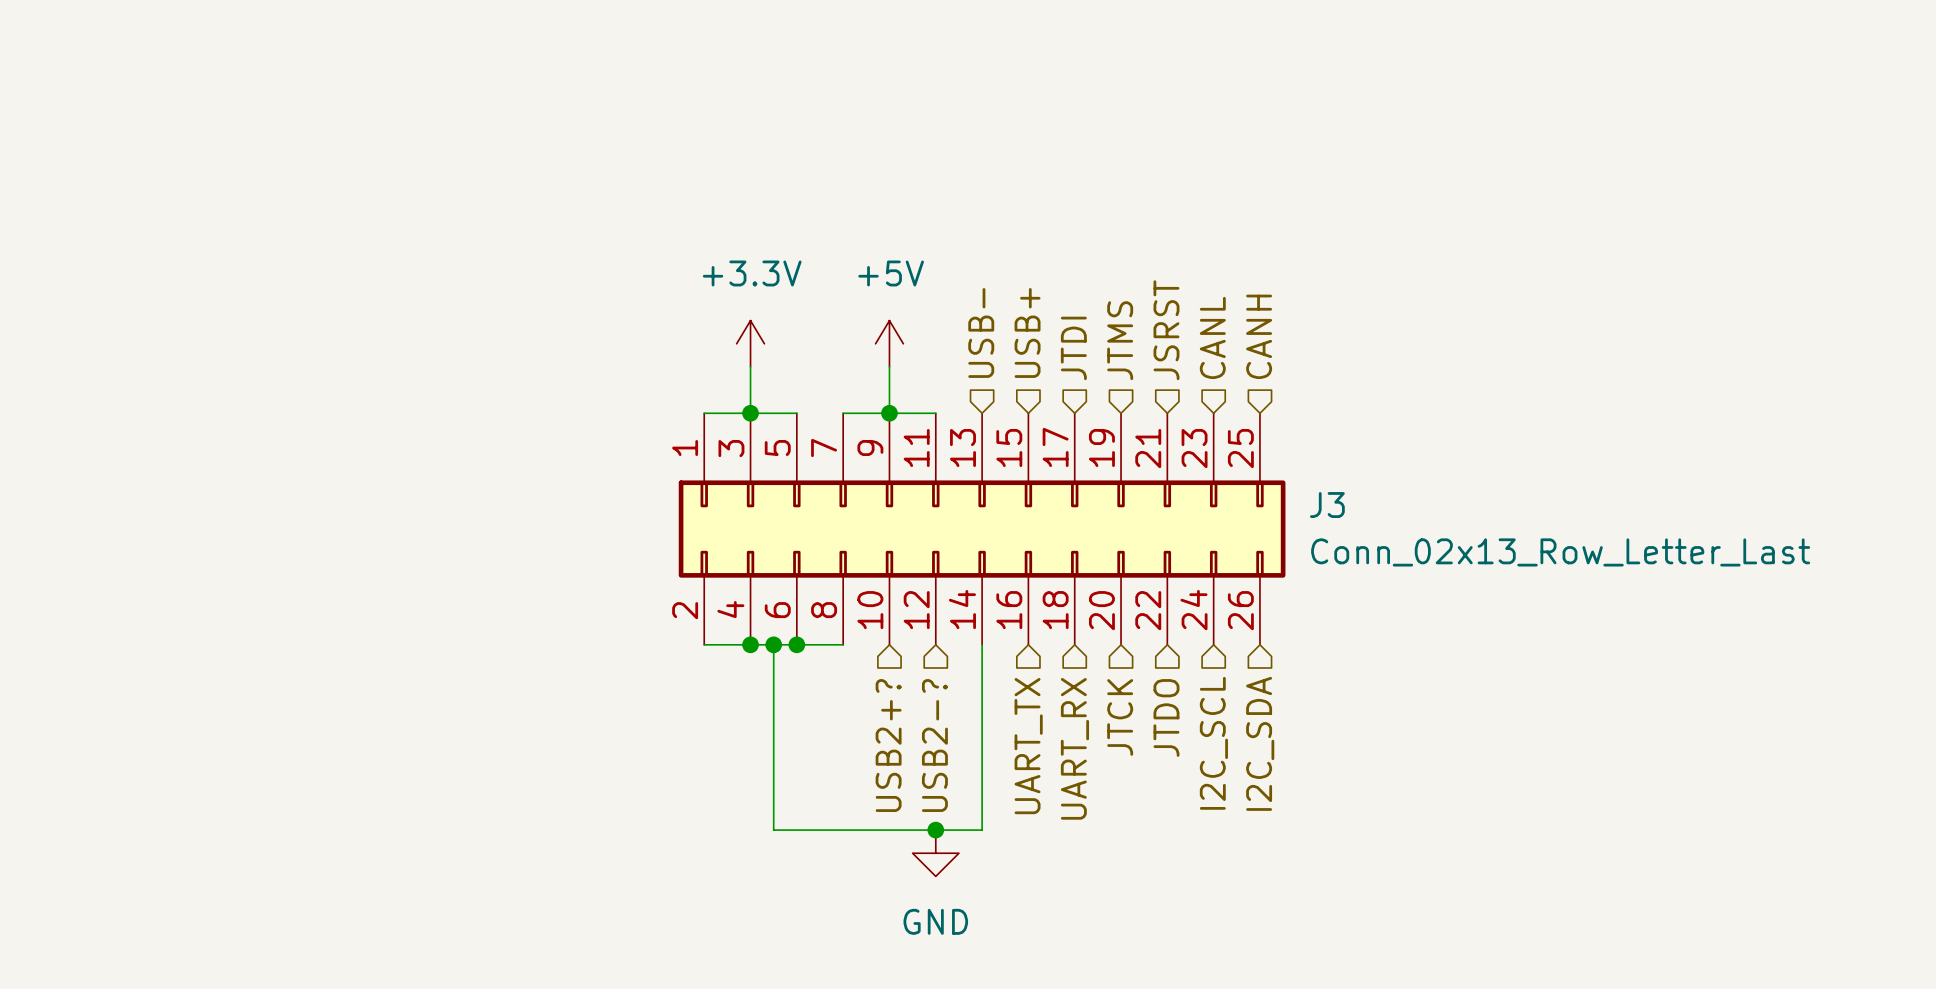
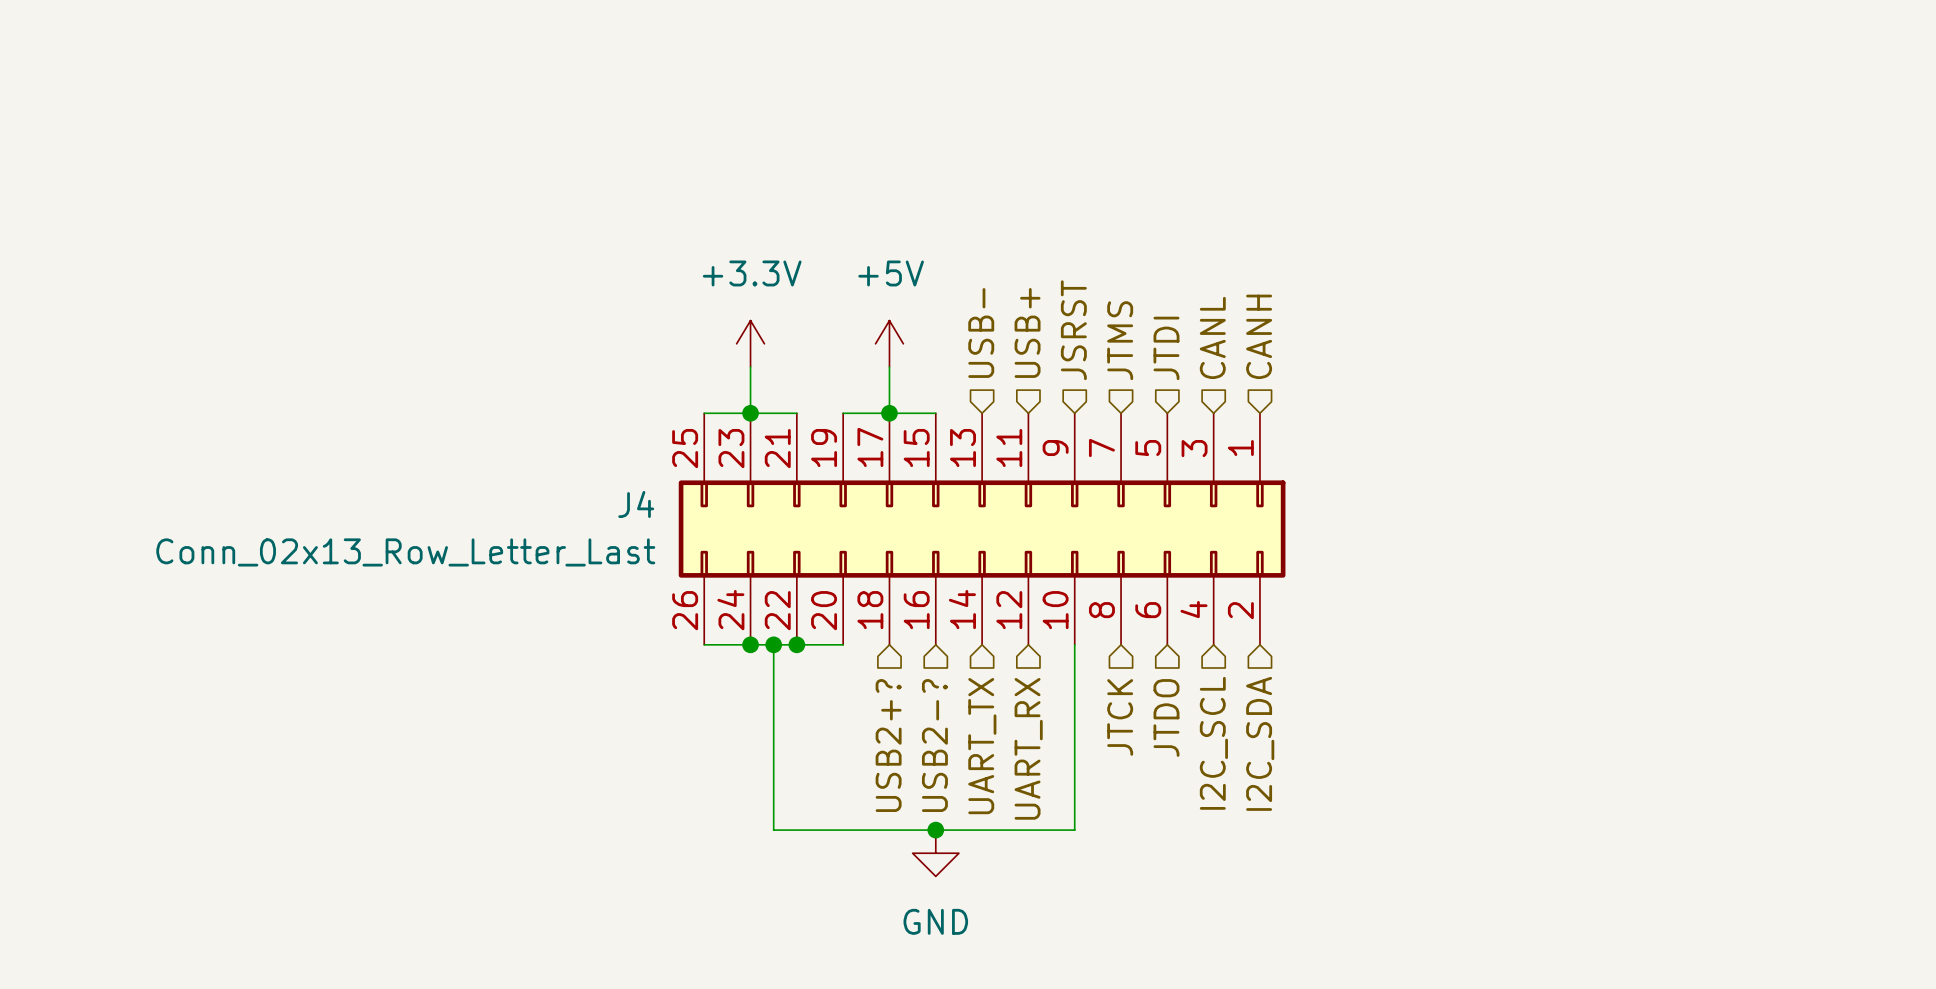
hierarchical label: JSRST (1166, 330) -> JTDI (1166, 348)
hierarchical label: JTDI (1073, 348) -> JSRST (1073, 330)
J3 name: J3 (1327, 505) -> J4 (636, 504)
J3 flip: as is (982, 529) -> left-right (982, 529)
wire: (982, 644) (982, 830) -> (1074, 644) (1074, 830) (982, 830)
hierarchical label: none -> UART_TX (982, 746)
hierarchical label: UART_TX (1028, 746) -> UART_RX (1028, 748)
hierarchical label: UART_RX (1074, 748) -> none

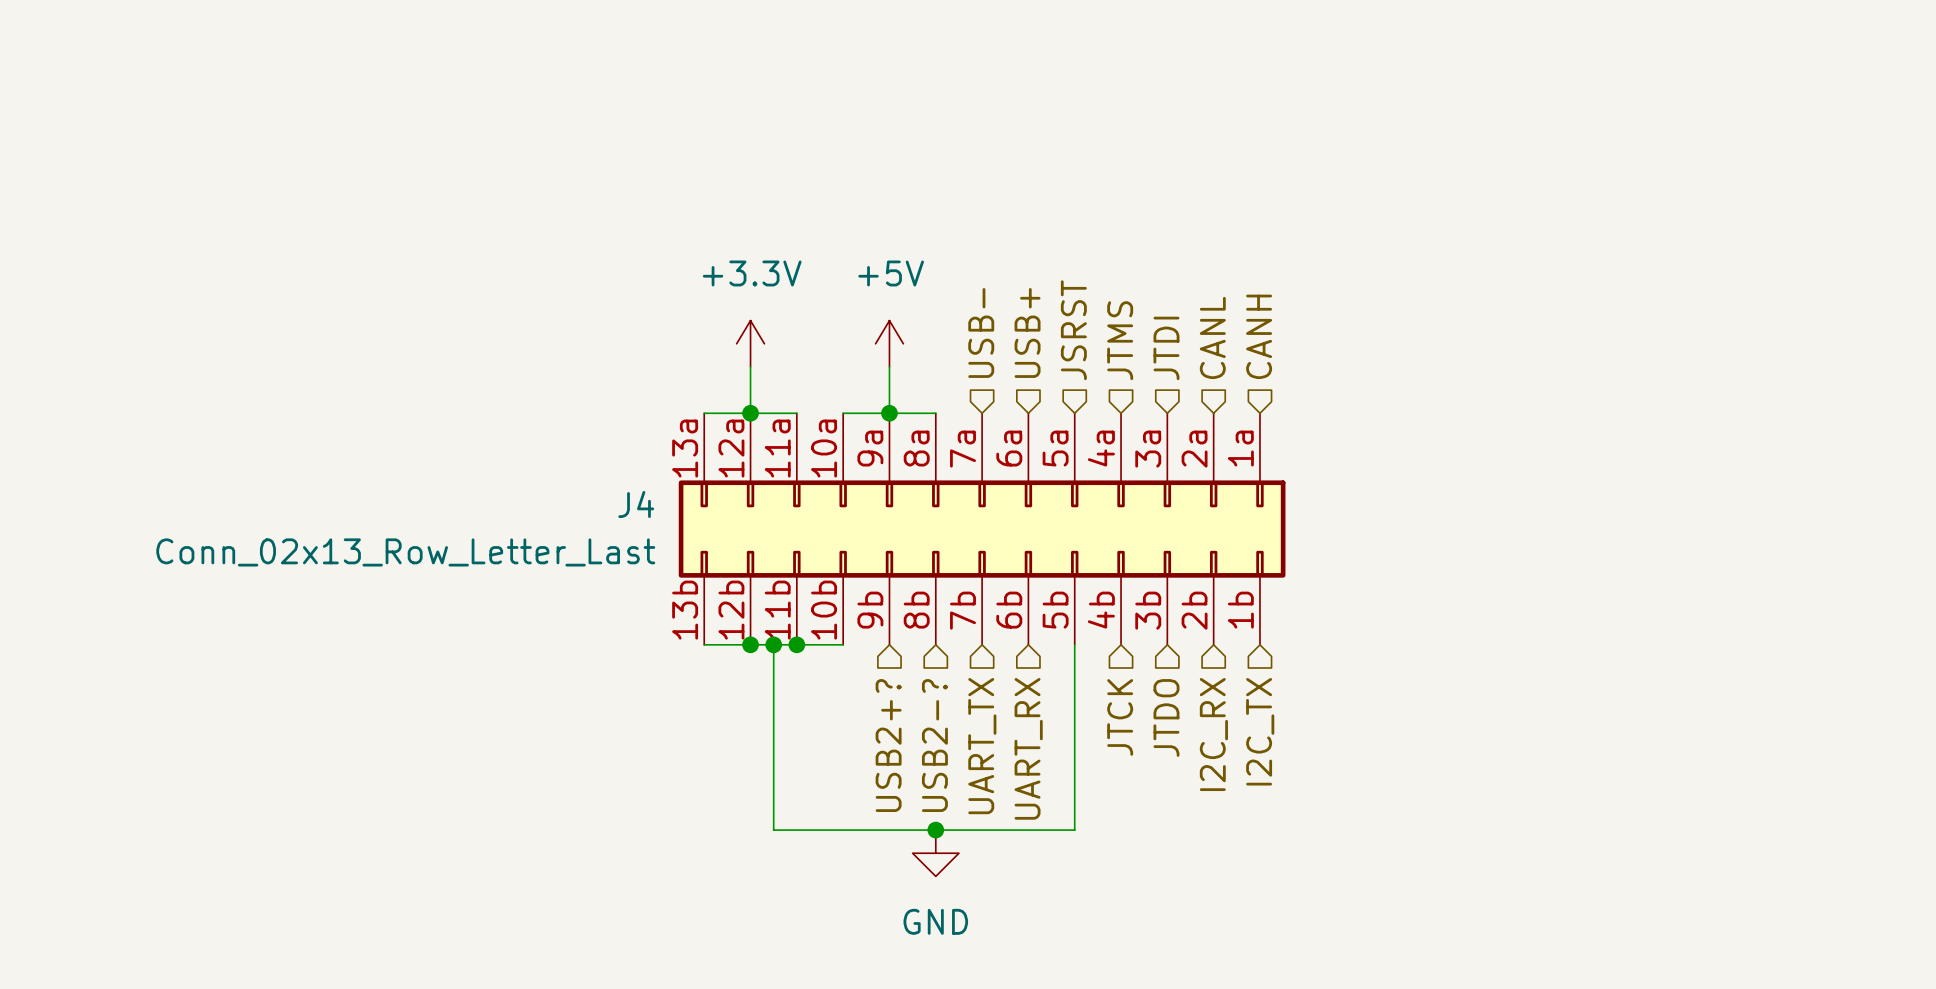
J4 symbol: [678, 413, 1286, 645] -> [678, 413, 1286, 645]
hierarchical label: I2C_SCL (1213, 743) -> I2C_RX (1213, 734)
hierarchical label: I2C_SDA (1260, 743) -> I2C_TX (1260, 731)

